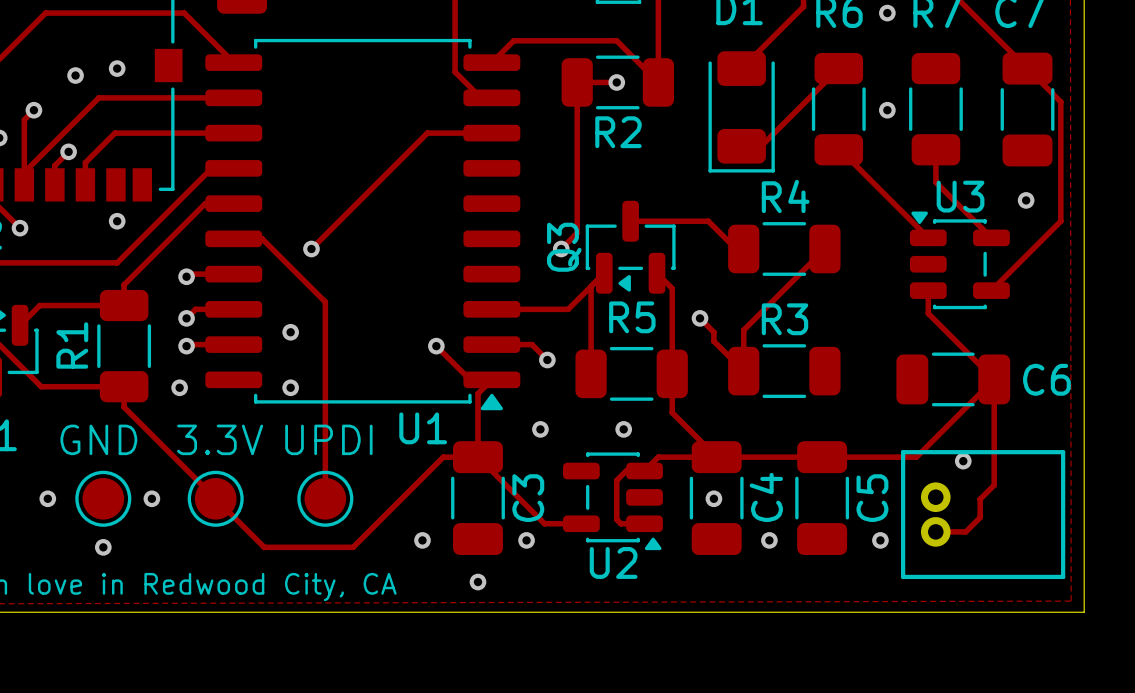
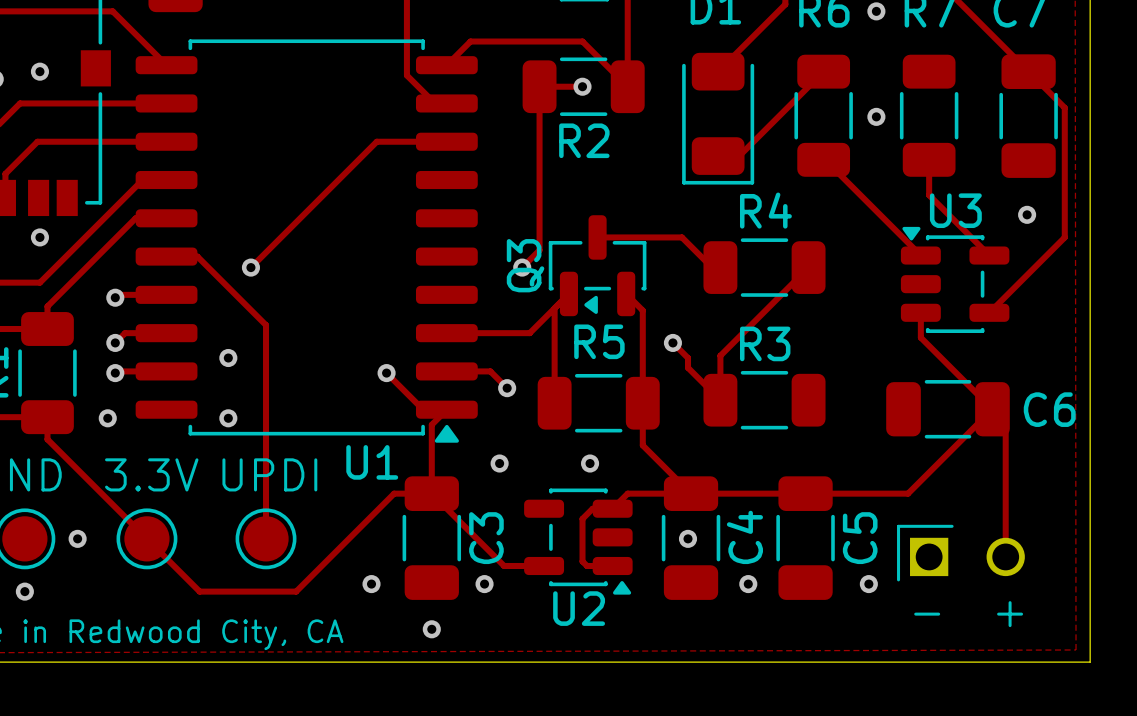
track: (994, 379) (994, 485) (980, 499) (980, 517) (965, 531) (935, 531) -> none
track: none -> (1005, 422) (1005, 556)
part footprint: [900, 450, 1066, 580] -> [897, 524, 1025, 582]
via: (963, 461) -> none
text: none -> - (927, 614)
text: none -> + (1010, 614)

